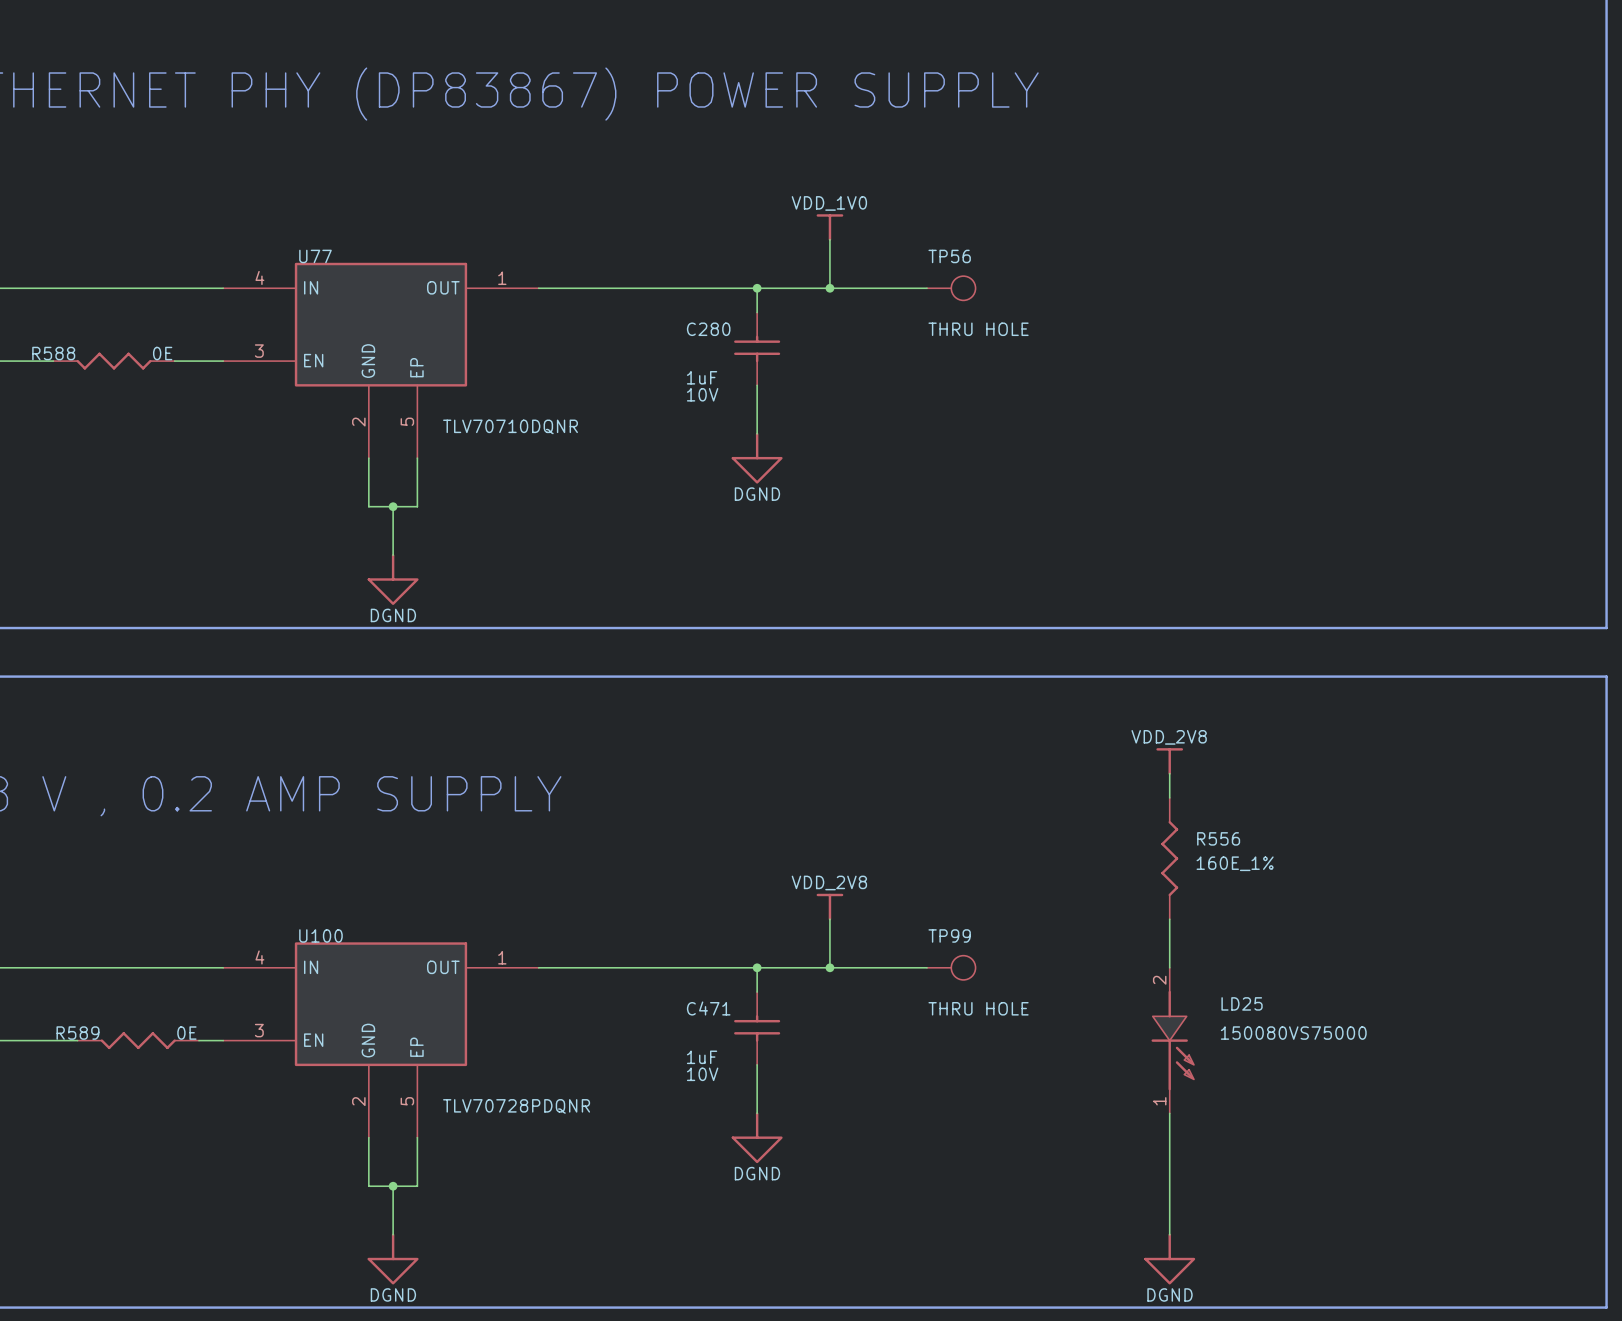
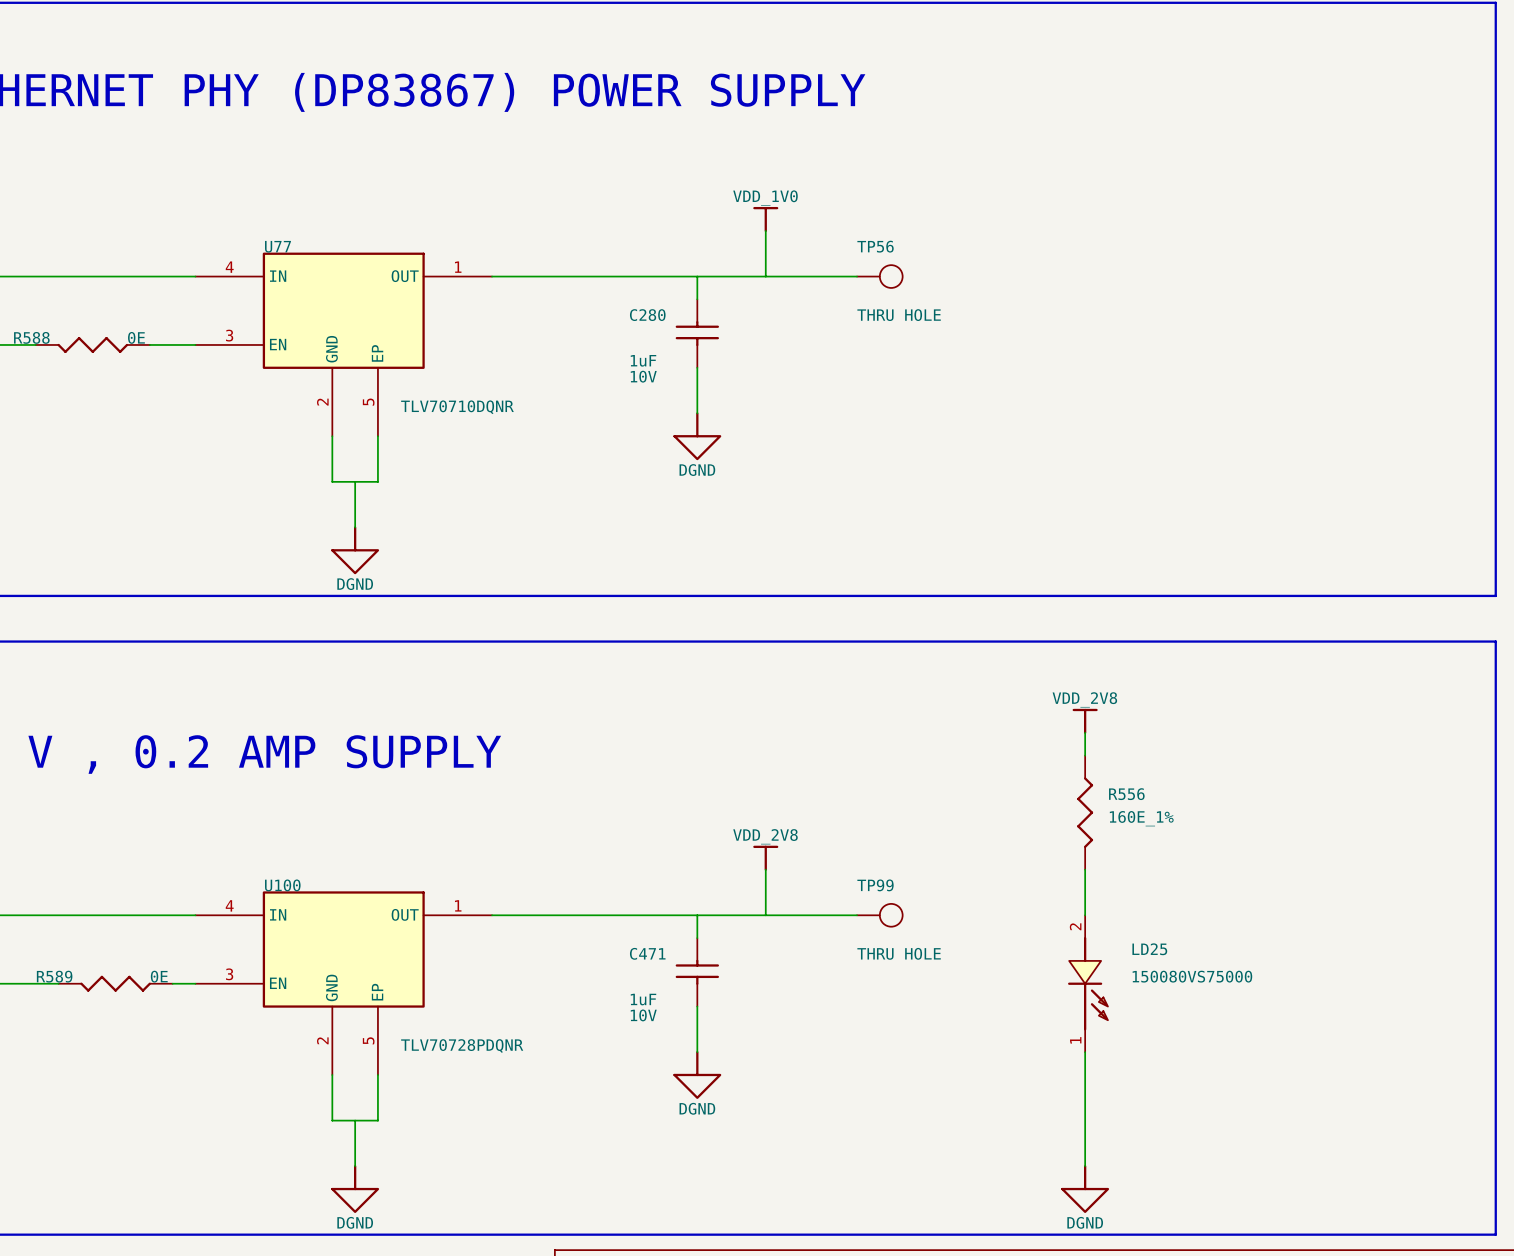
junction: (757, 288) -> none
junction: (829, 288) -> none
junction: (393, 506) -> none
junction: (757, 967) -> none
junction: (829, 967) -> none
junction: (393, 1186) -> none

